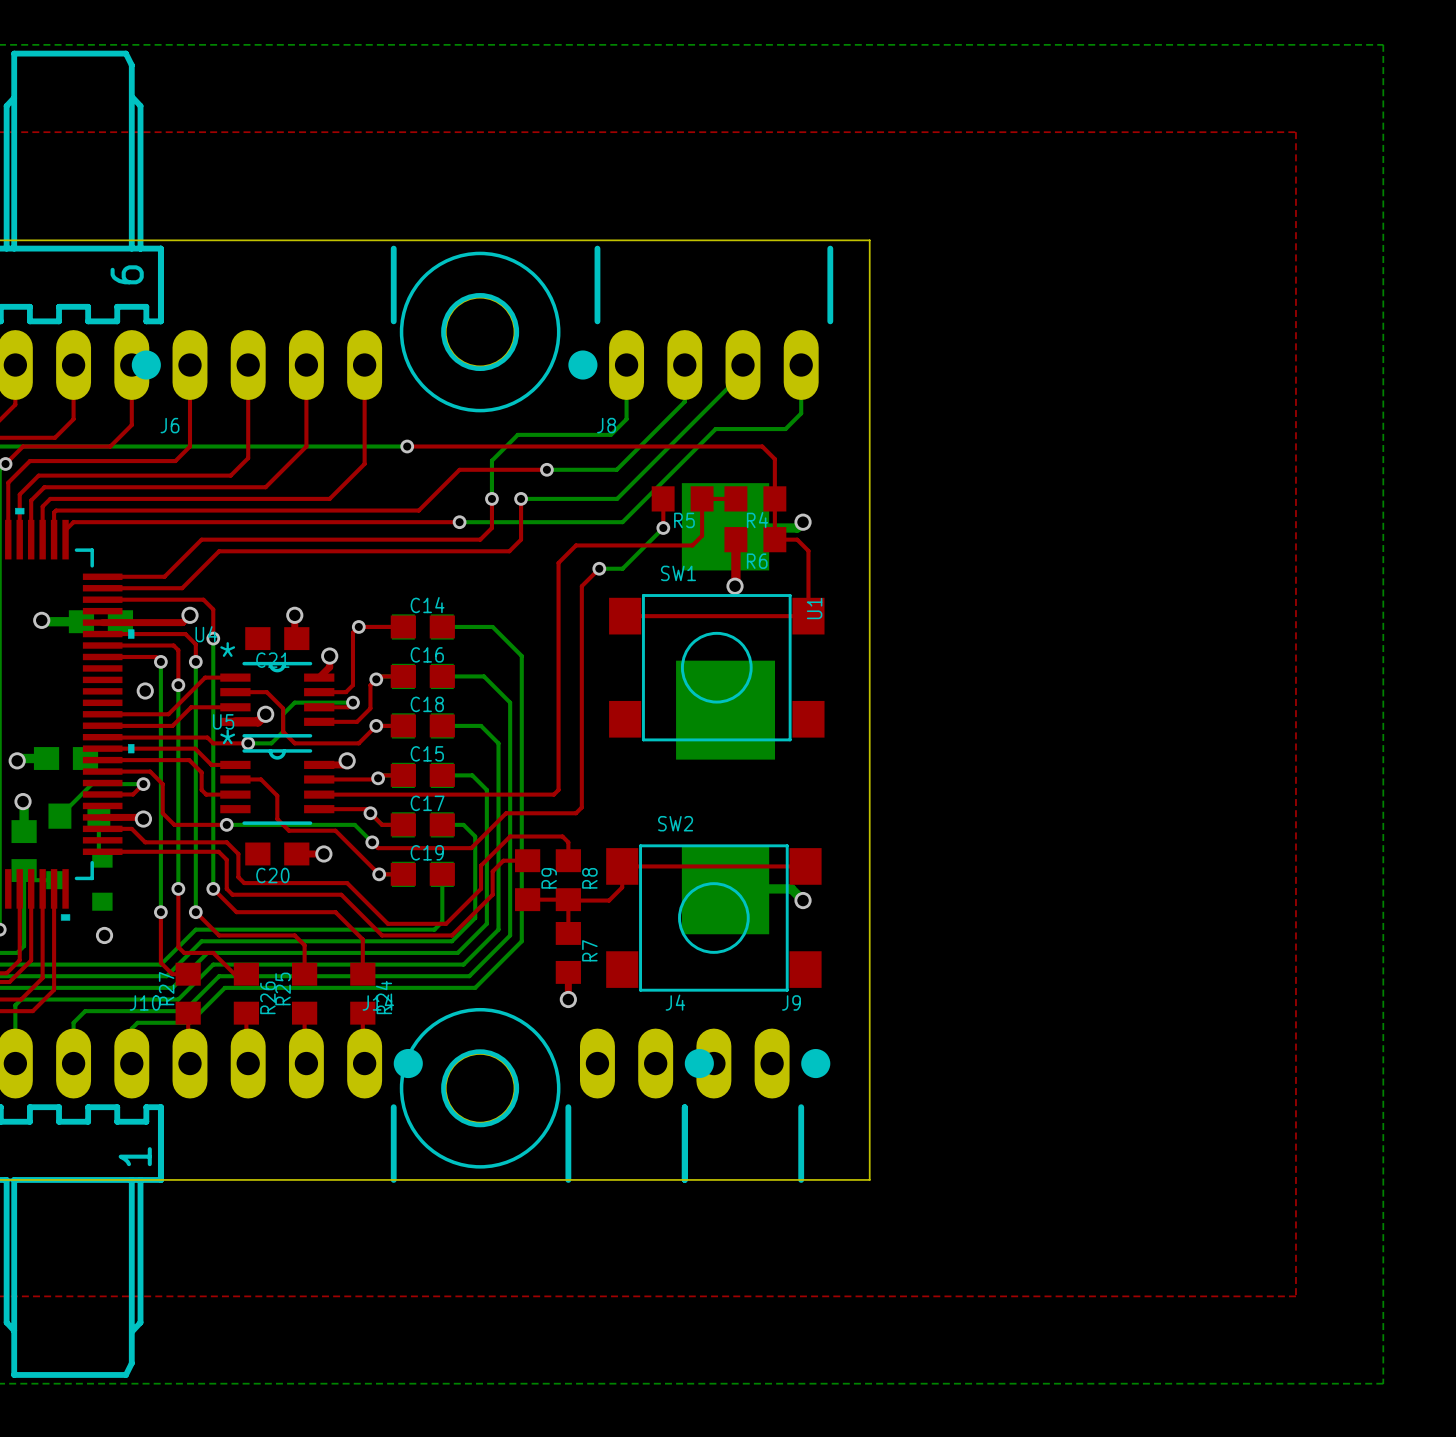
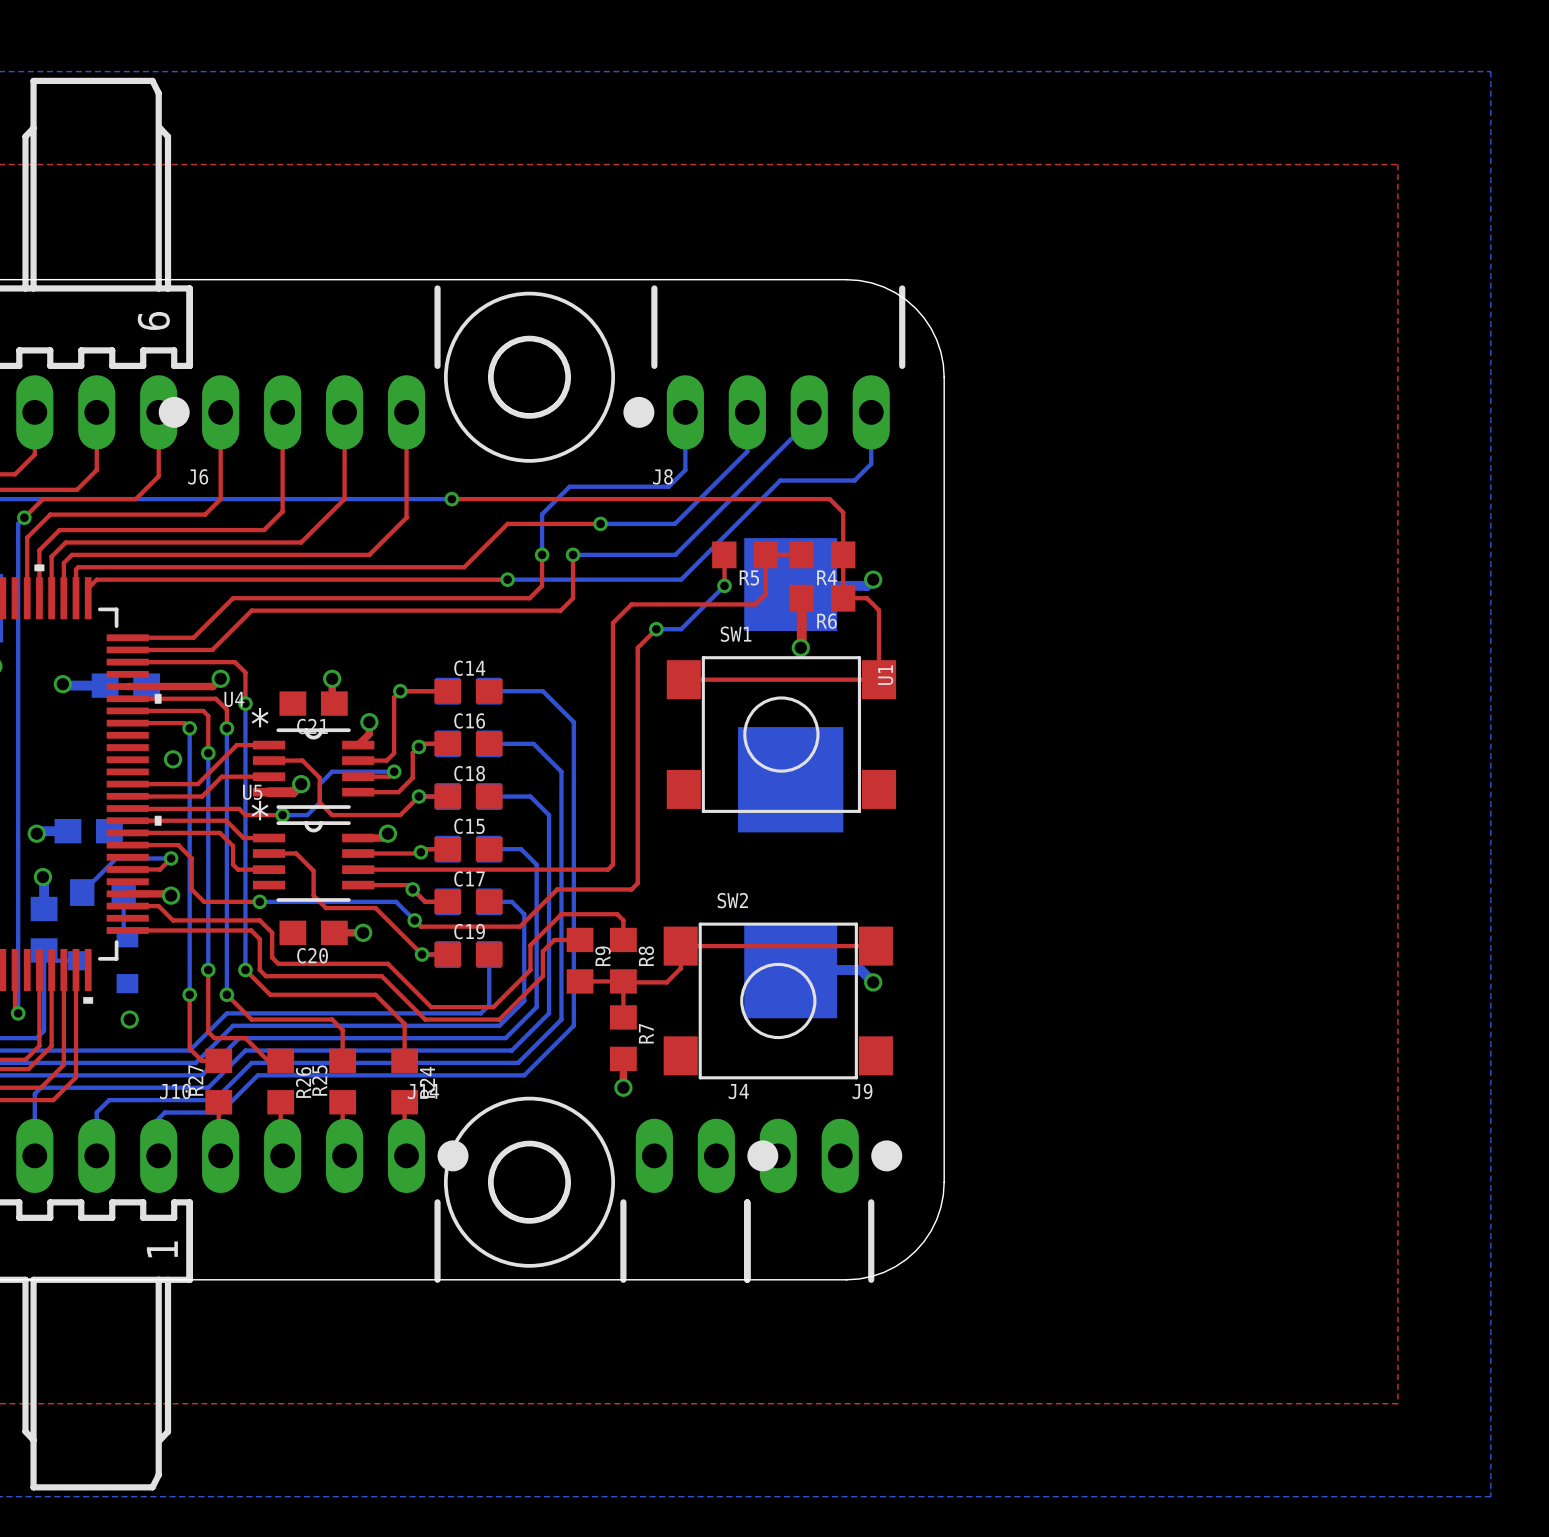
board edge: (778, 240) (869, 240) (869, 332) -> (846, 279) (859, 280) (883, 287) (895, 292) (915, 308) (931, 328) (936, 339) (943, 364) (944, 377)
board edge: (869, 1088) (869, 1179) (778, 1179) -> (944, 1182) (943, 1194) (936, 1219) (931, 1231) (915, 1251) (895, 1266) (883, 1272) (859, 1278) (846, 1279)

